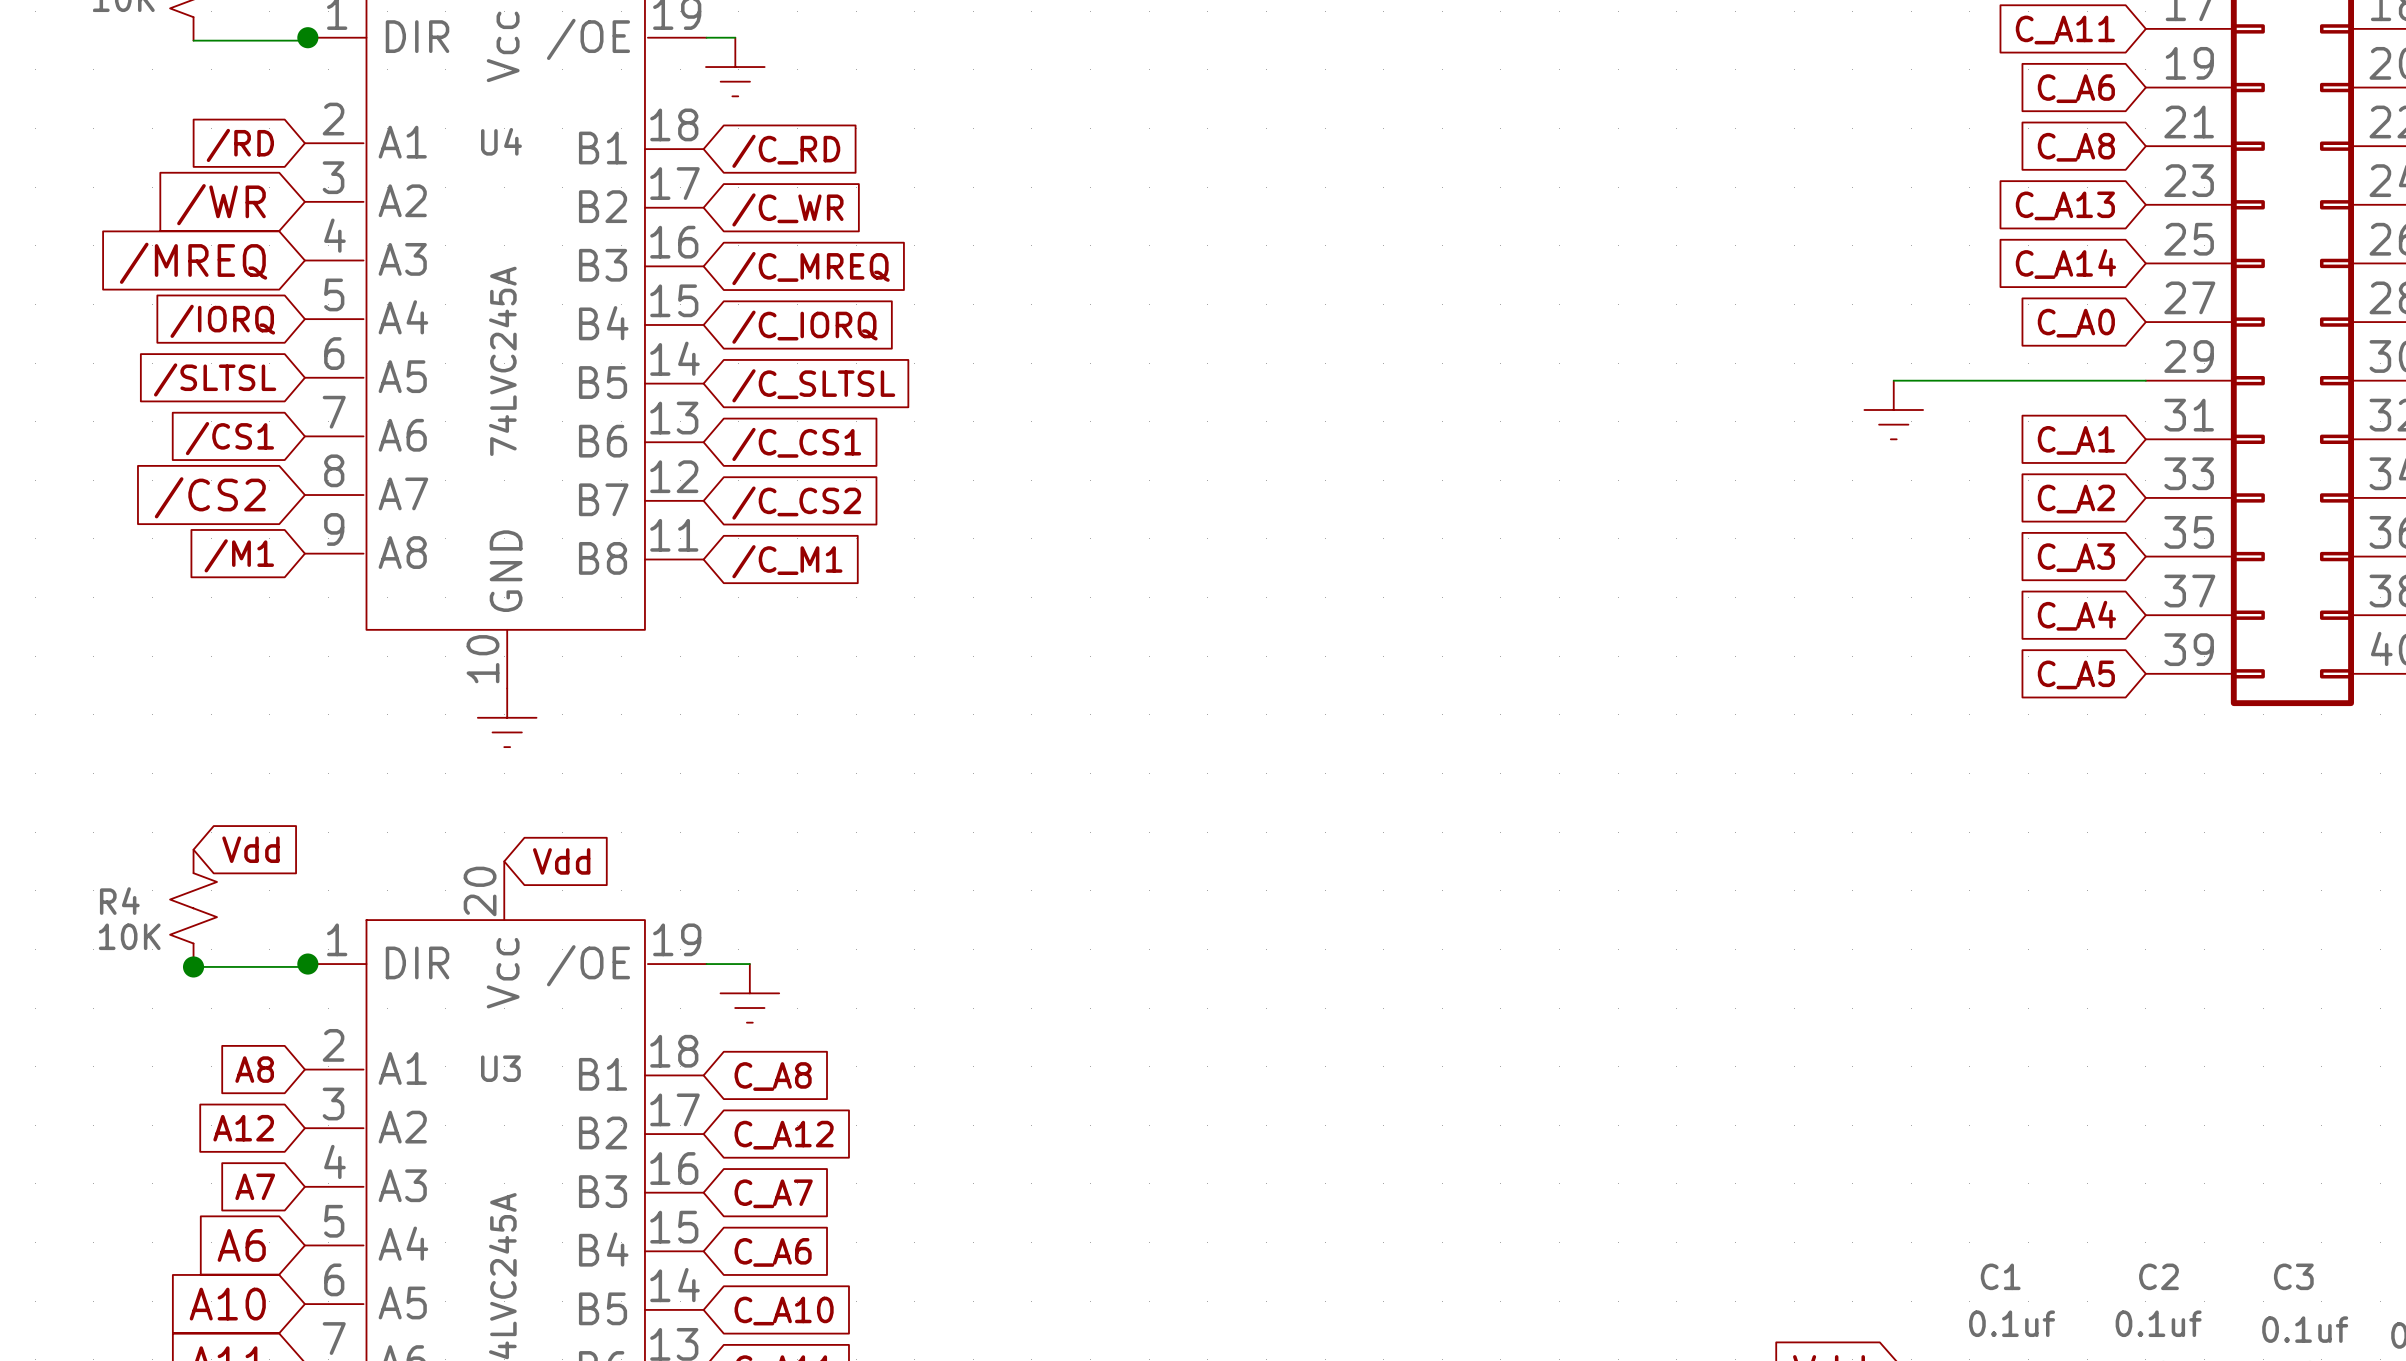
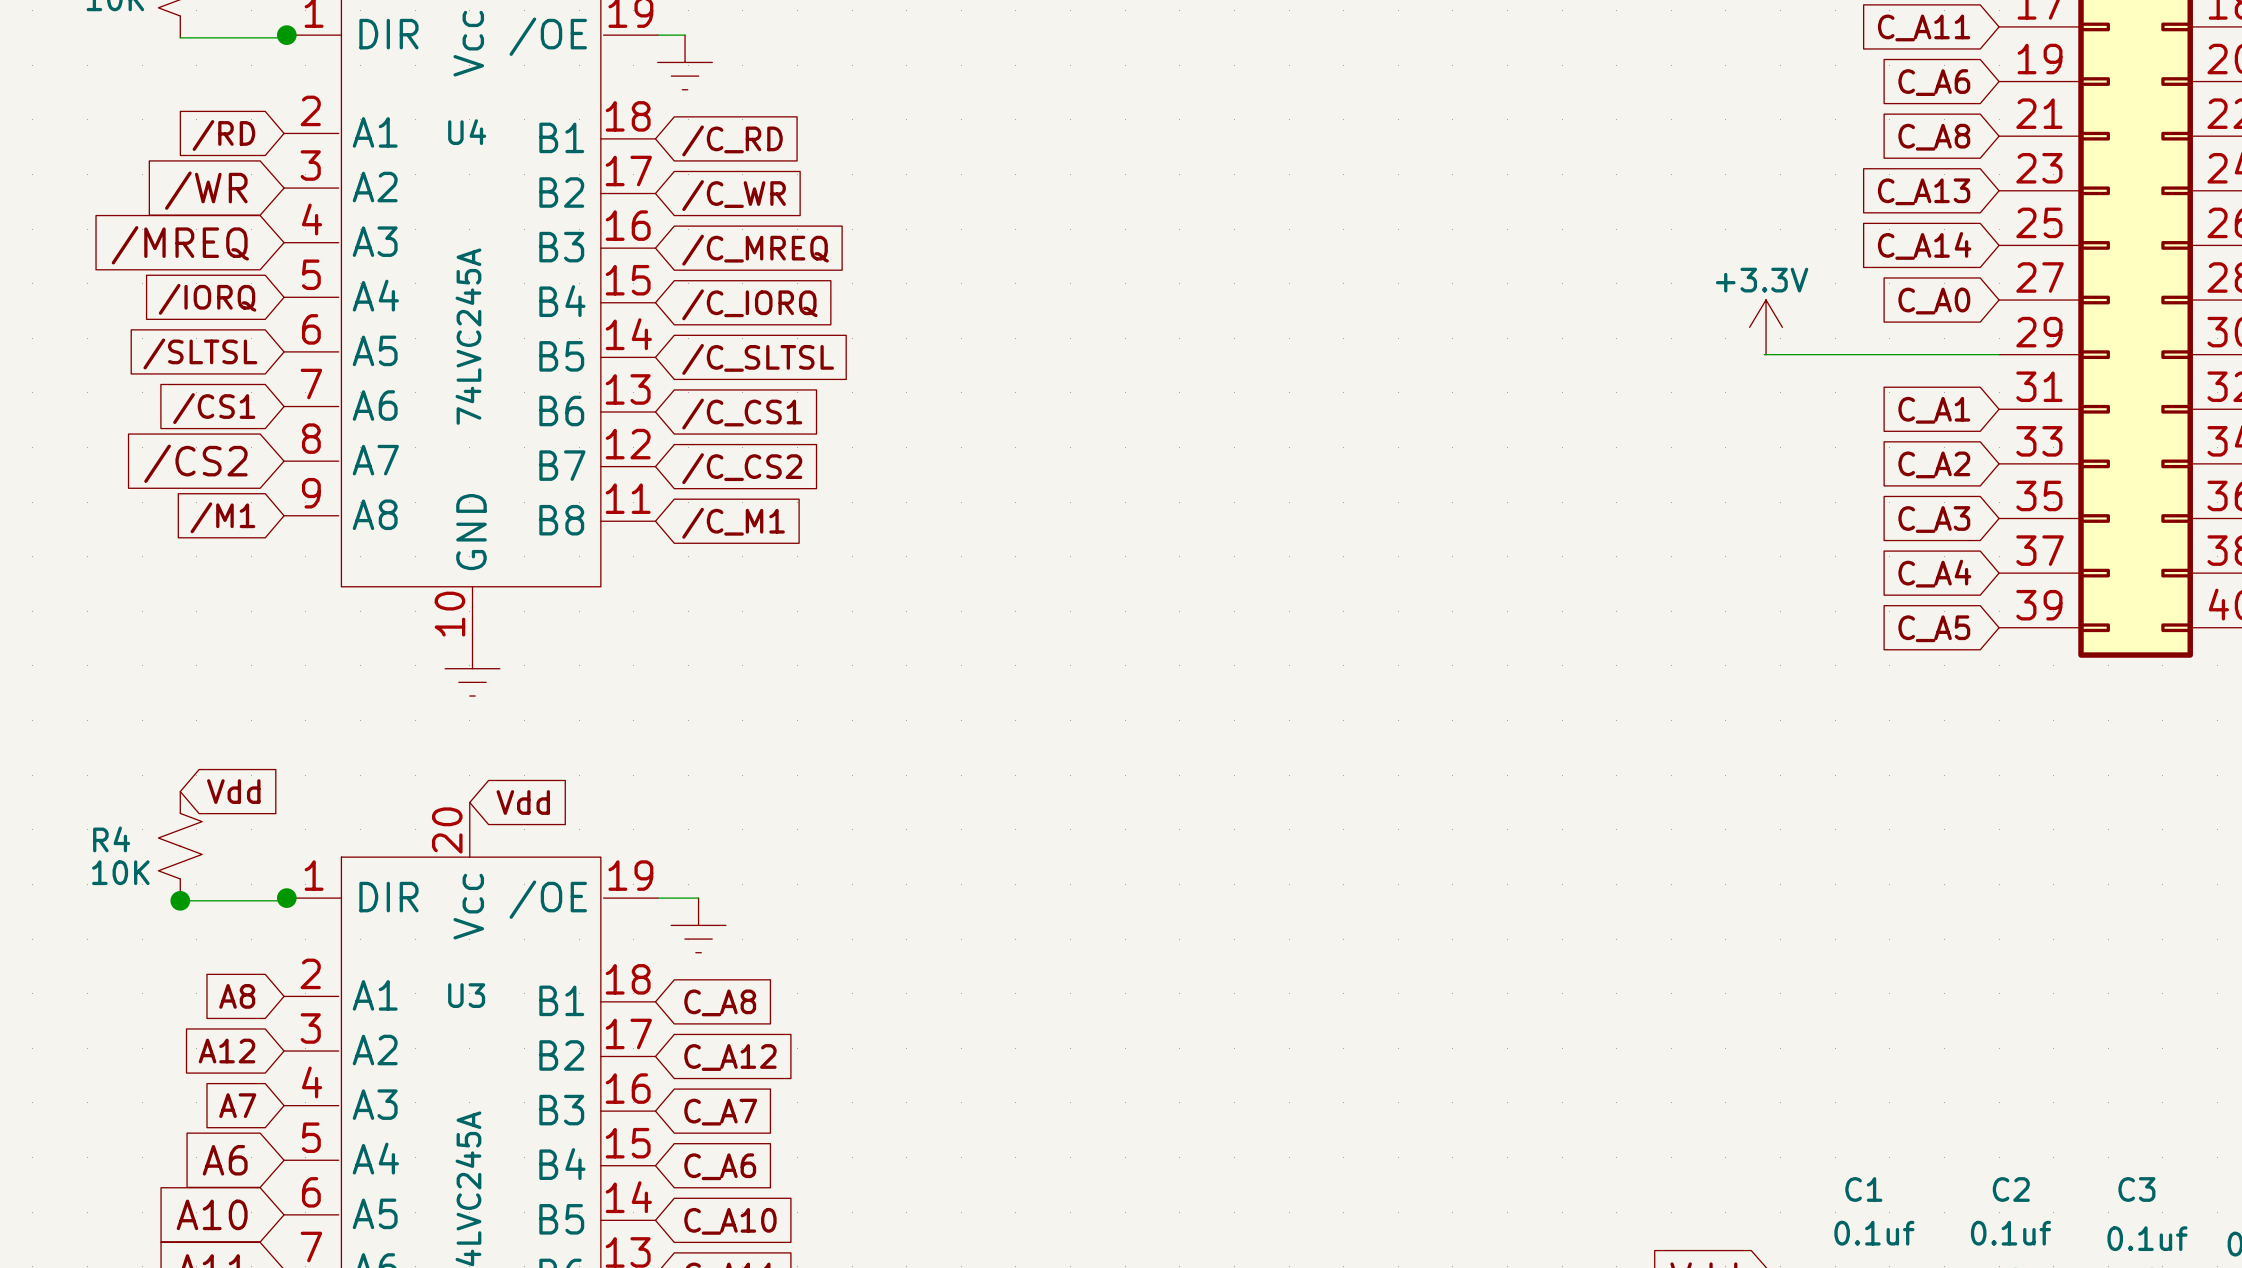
power symbol: none -> +3.3V (1766, 327)
power symbol: (1893, 410) -> none

